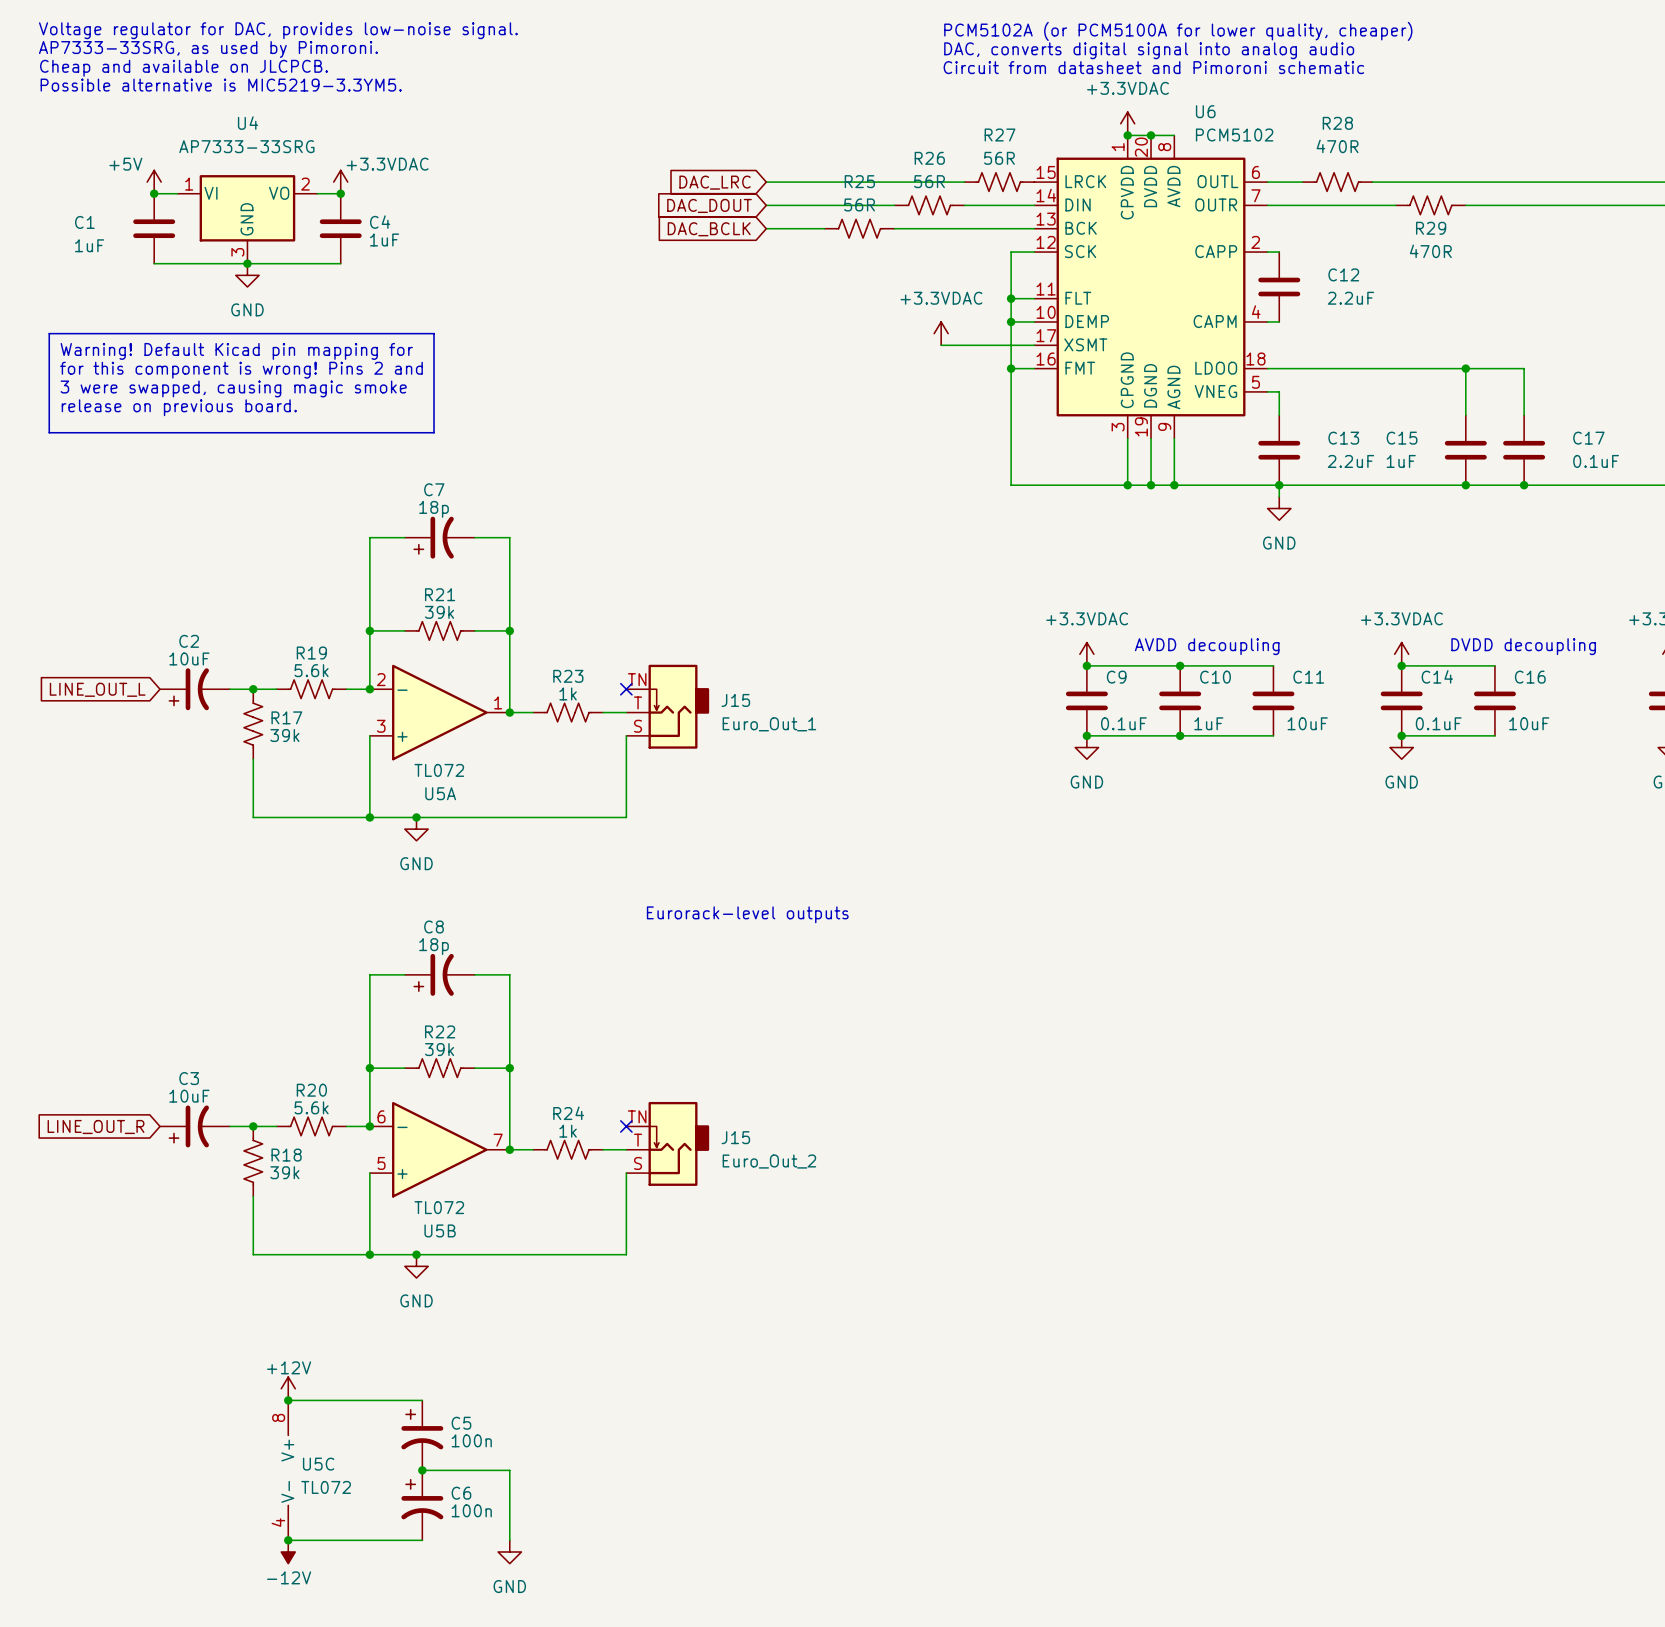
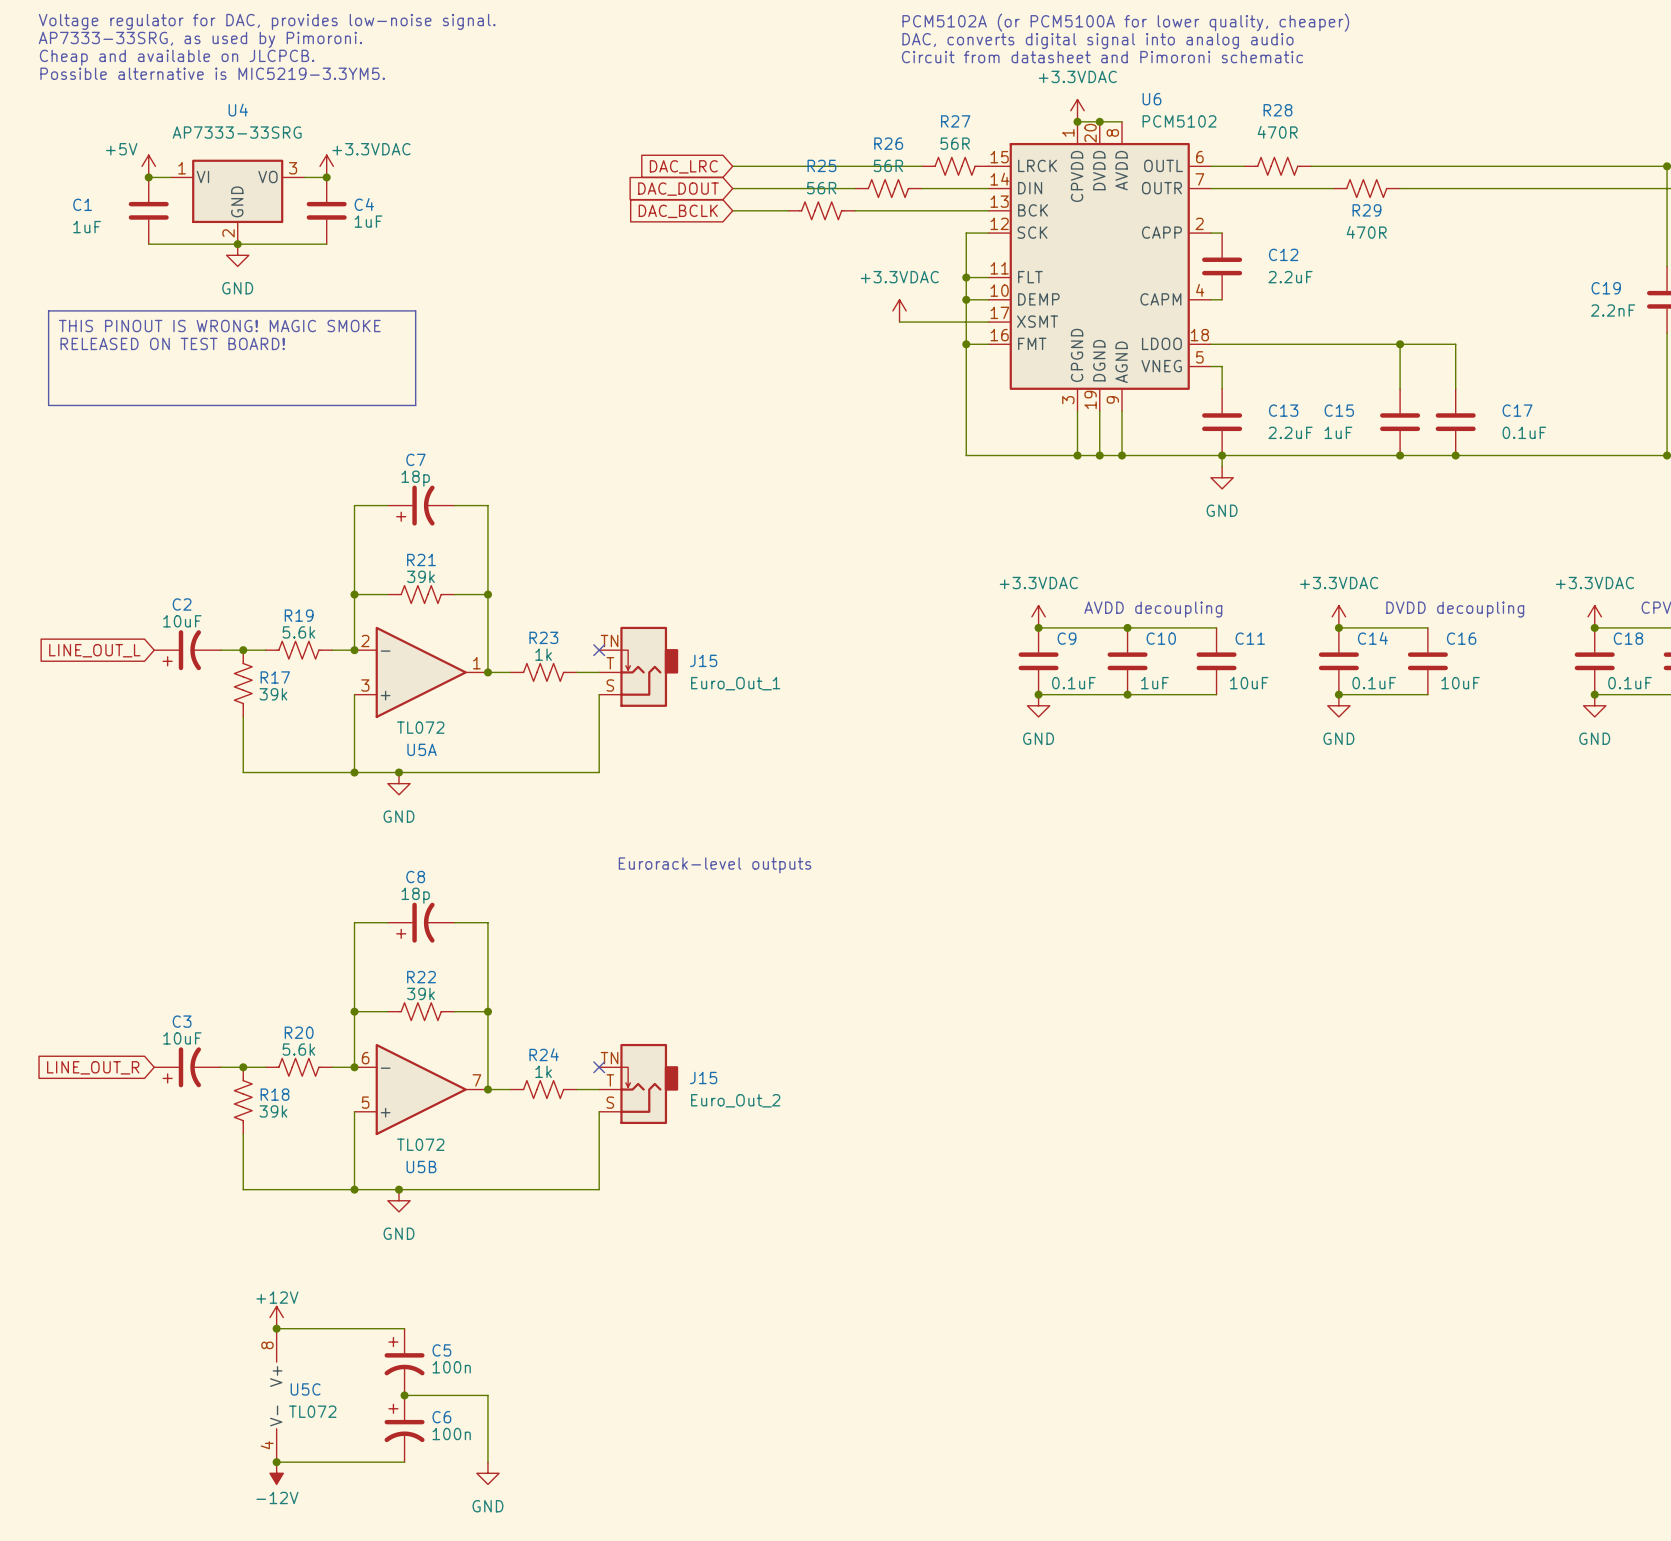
U4 pin number: 2 (305, 184) -> 3 (293, 168)
U4 pin number: 3 (237, 252) -> 2 (228, 233)
text: Warning! Default Kicad pin mapping for (236, 351) -> THIS PINOUT IS WRONG! MAGIC SMOKE (219, 326)
text: for this component is wrong! Pins 2 and (241, 370) -> RELEASED ON TEST BOARD! (172, 343)
text: 3 were swapped, causing magic smoke (233, 388) -> none
text: release on previous board. (179, 407) -> none

